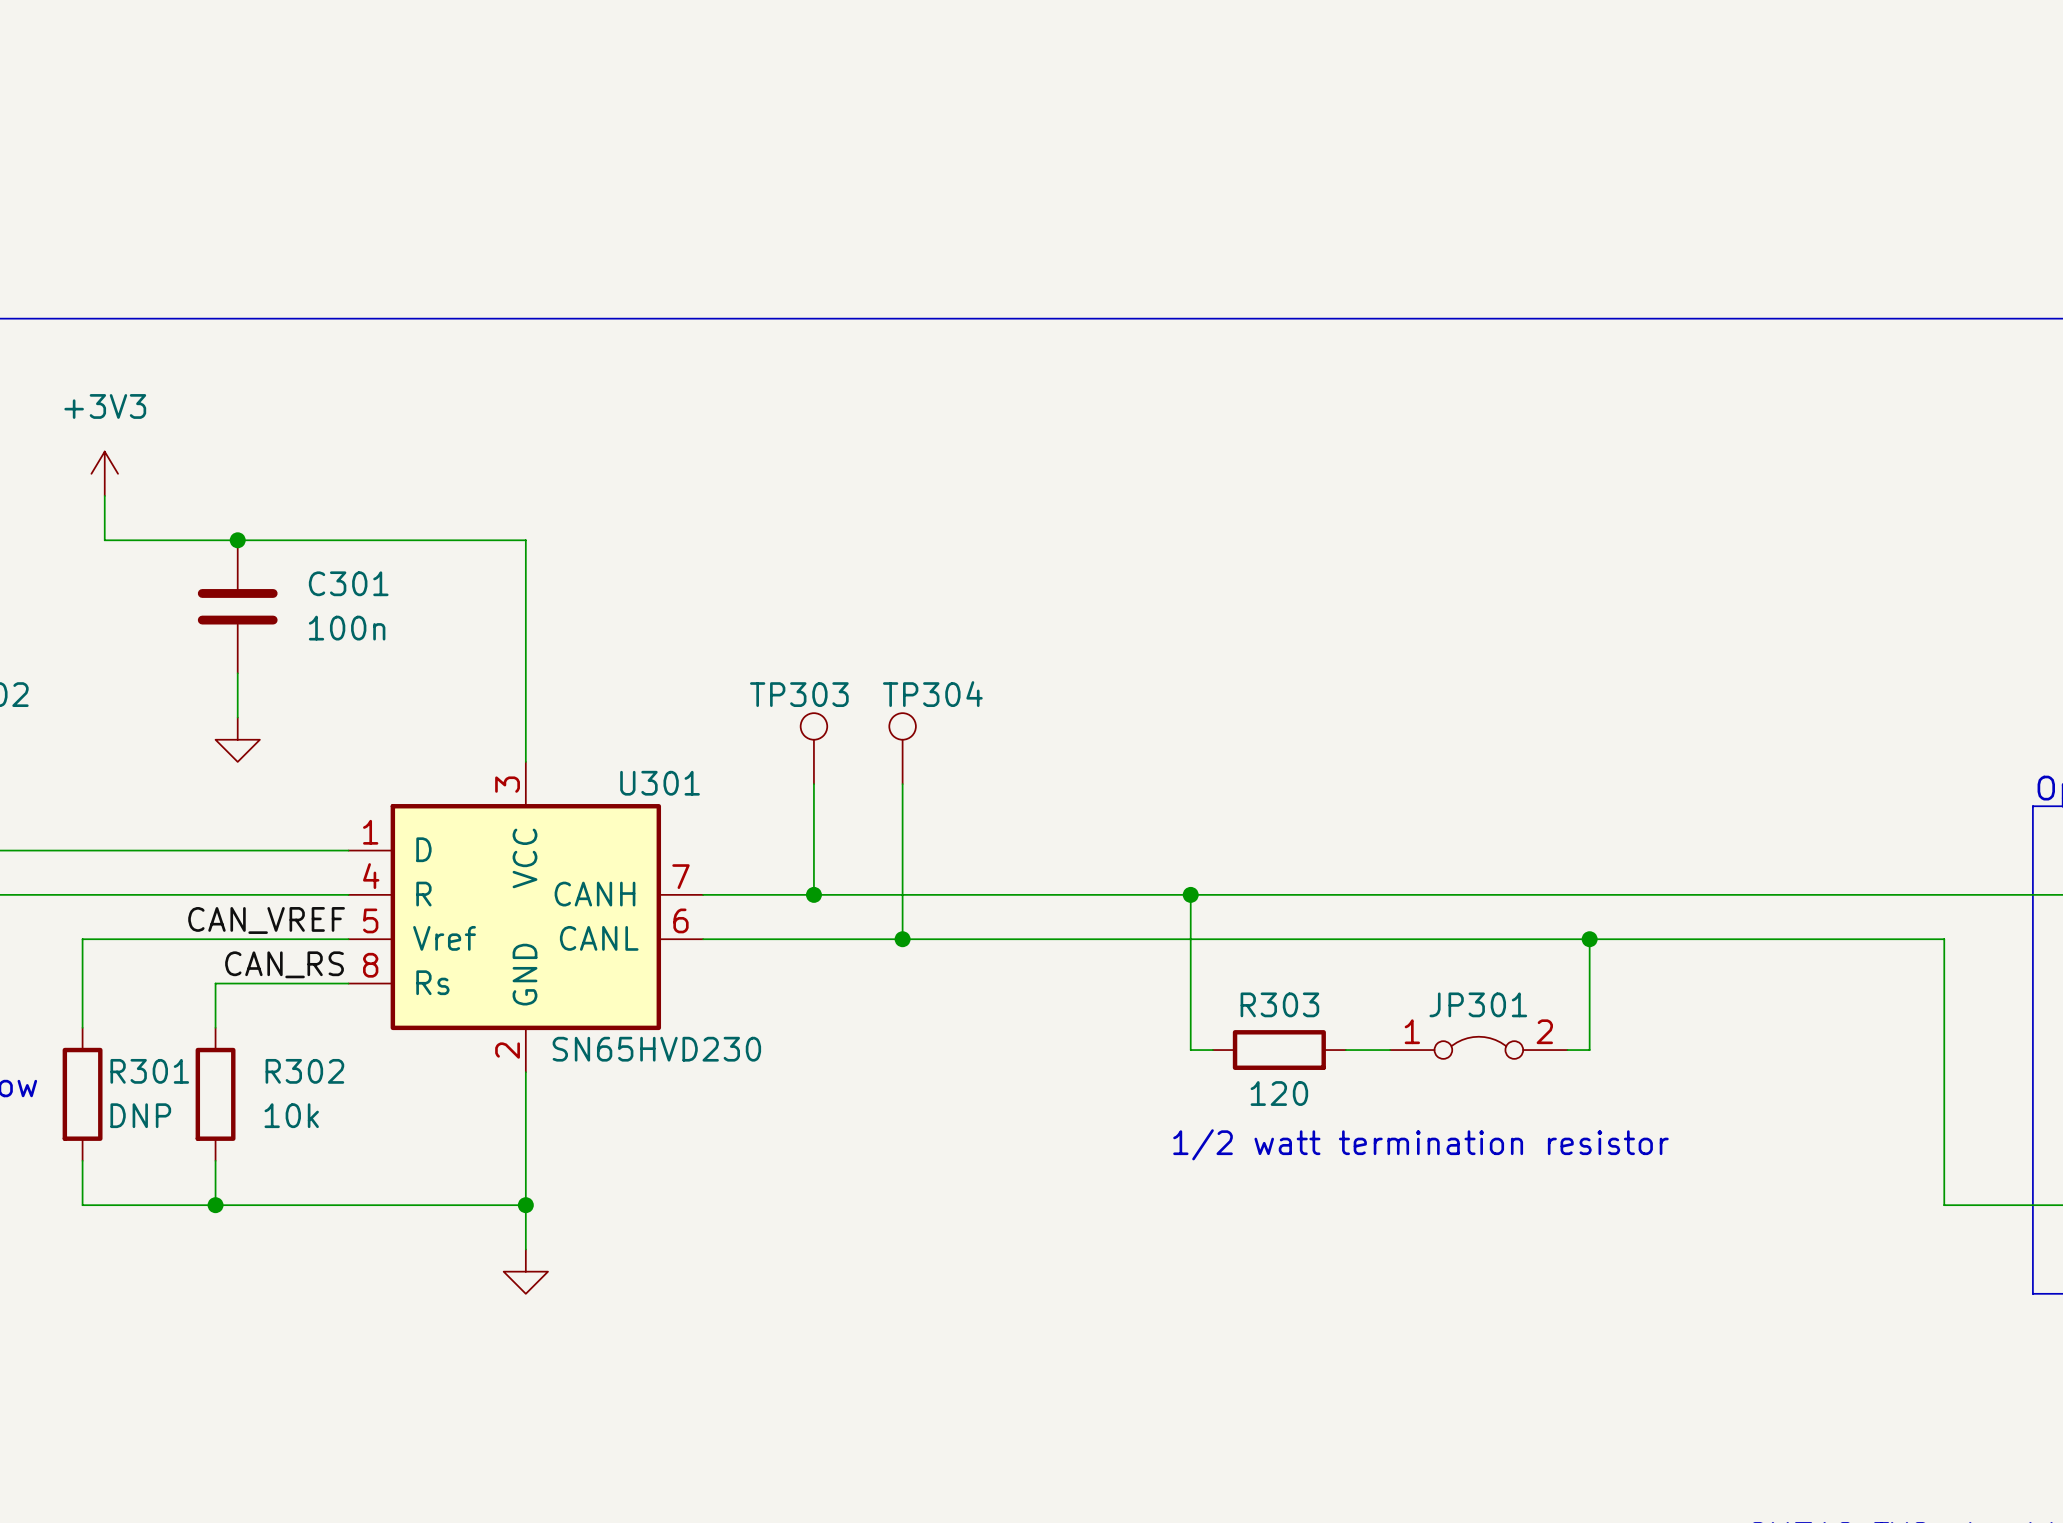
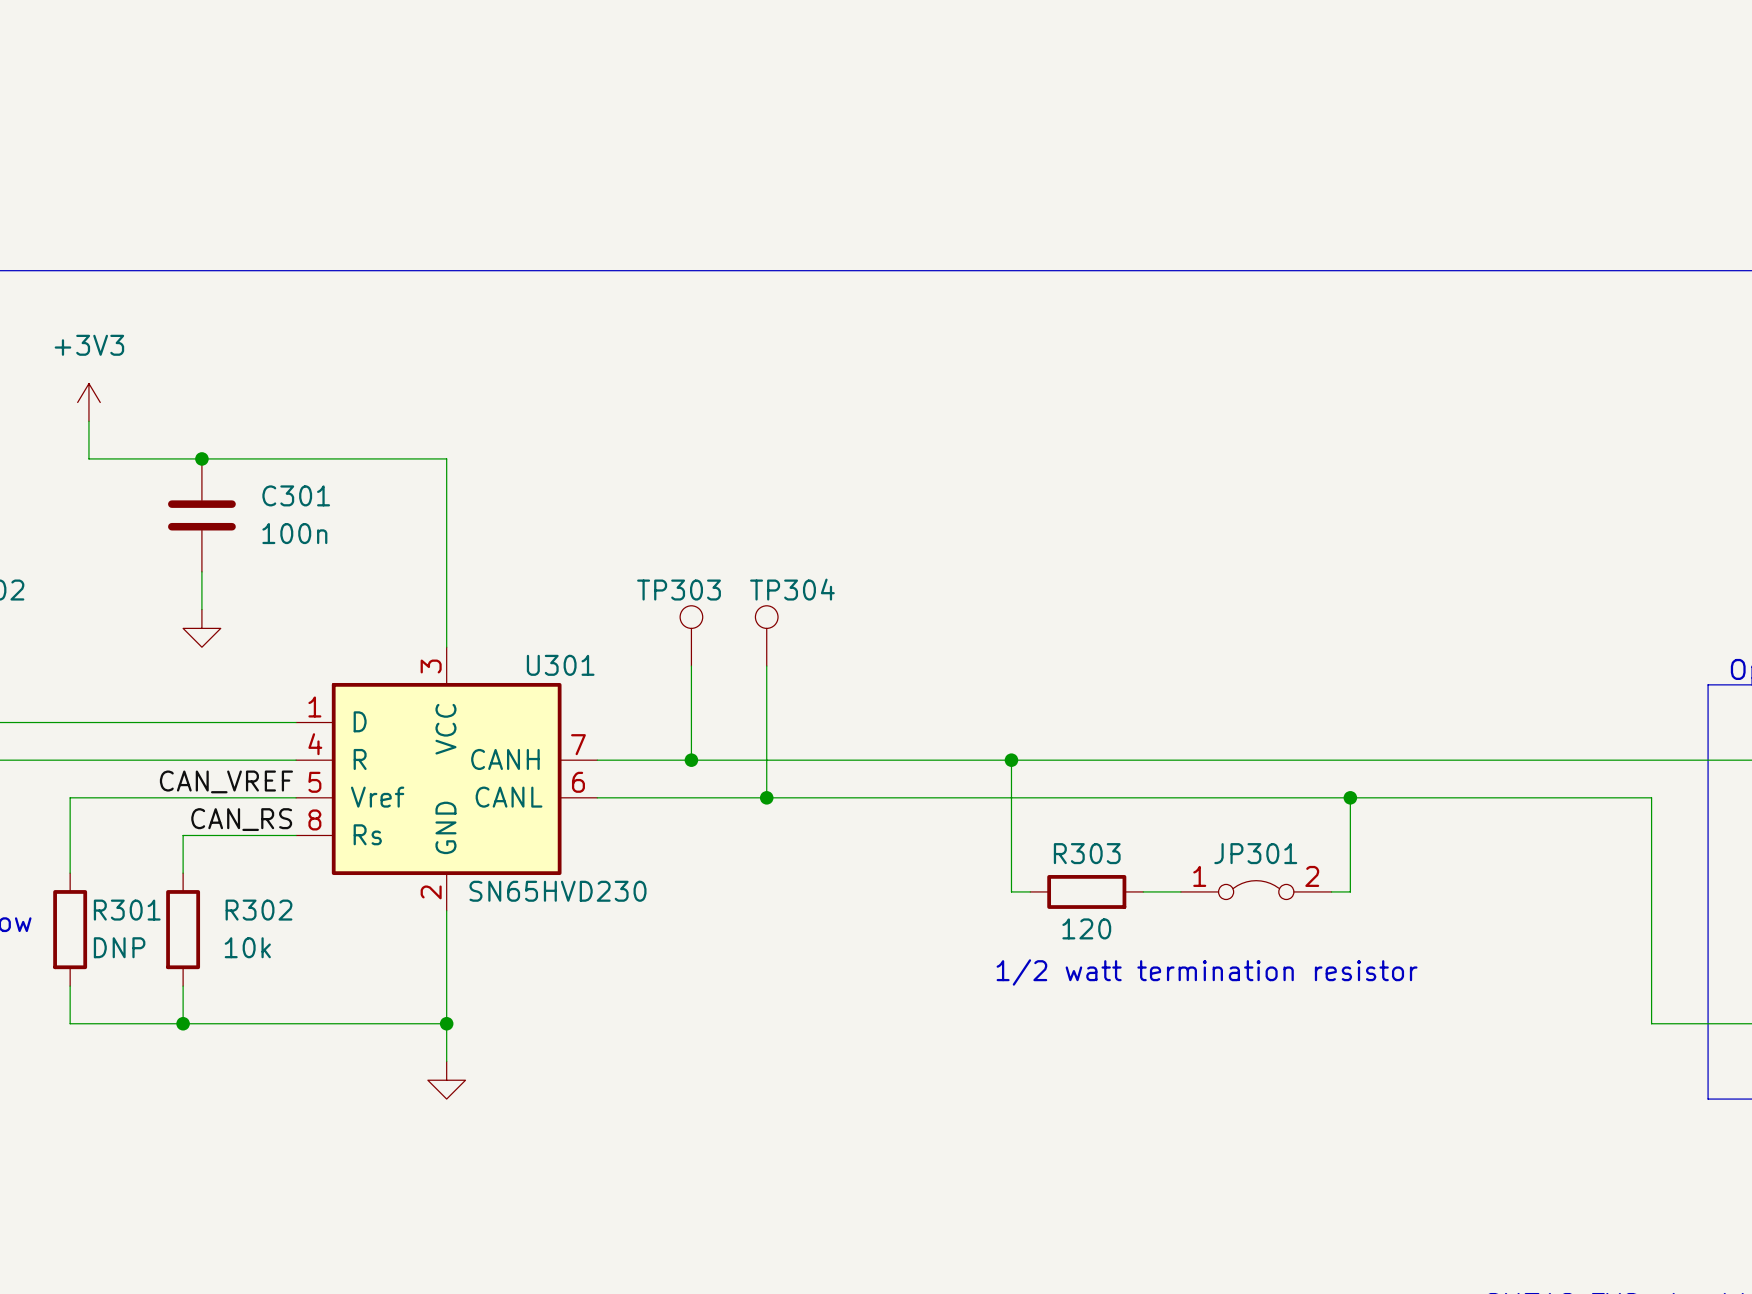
line: (2032, 806) (2032, 1293) -> (1726, 684) (1708, 684) (1708, 1099) (1726, 1099)

